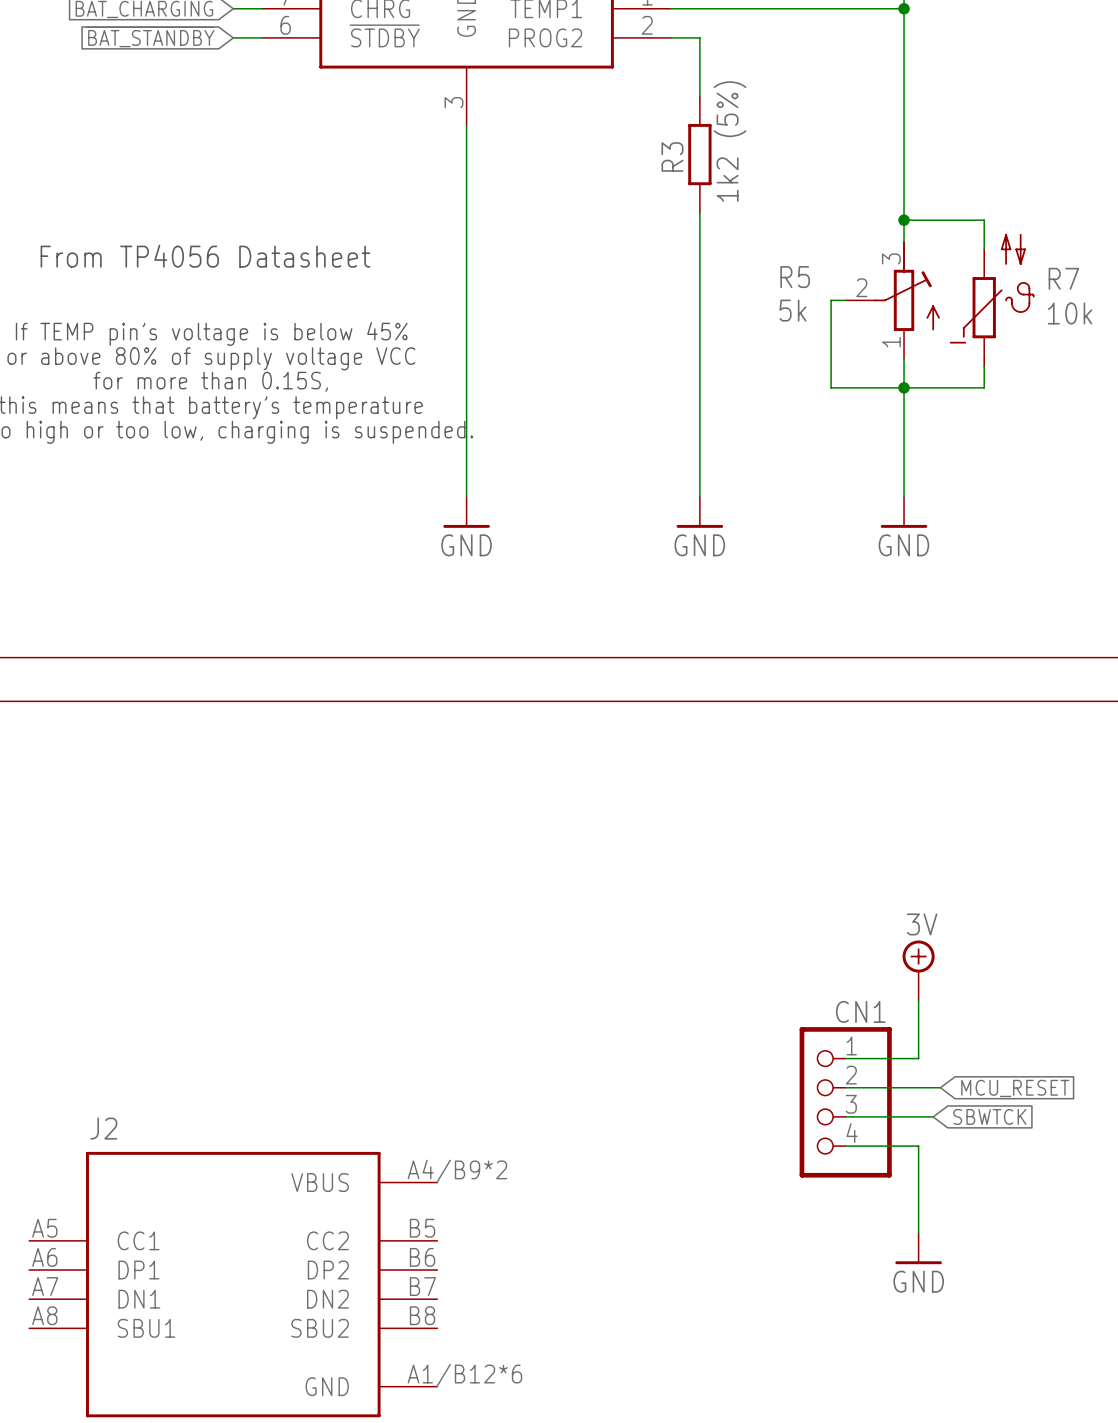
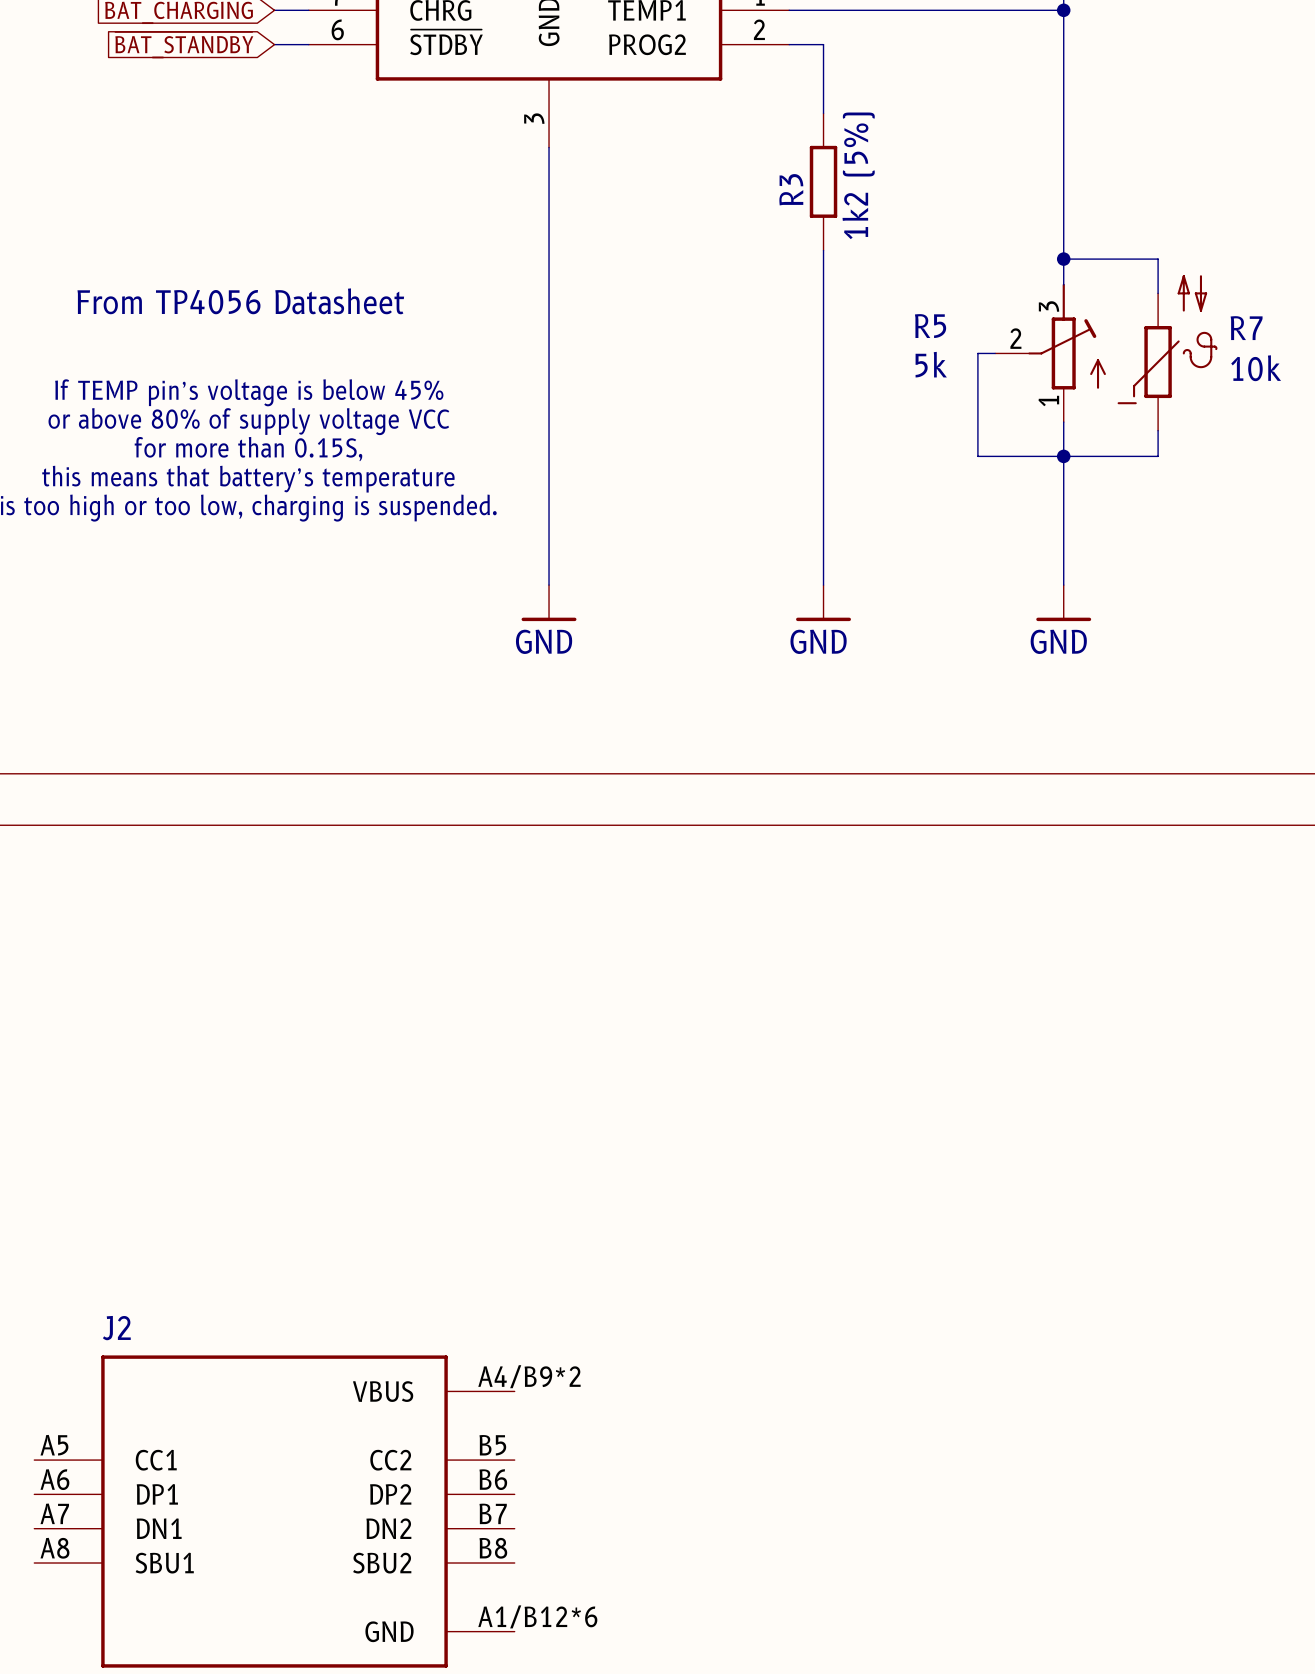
power symbol: 3V (918, 970) -> none
wire: (918, 1000) (918, 1058) (845, 1058) -> none
wire: (845, 1087) (940, 1087) -> none
global label: MCU_RESET (1015, 1088) -> none
CN1: (845, 1102) -> none
wire: (845, 1116) (933, 1116) -> none
global label: SBWTCK (989, 1116) -> none
wire: (845, 1146) (918, 1146) (918, 1233) -> none
power symbol: GND (918, 1248) -> none

